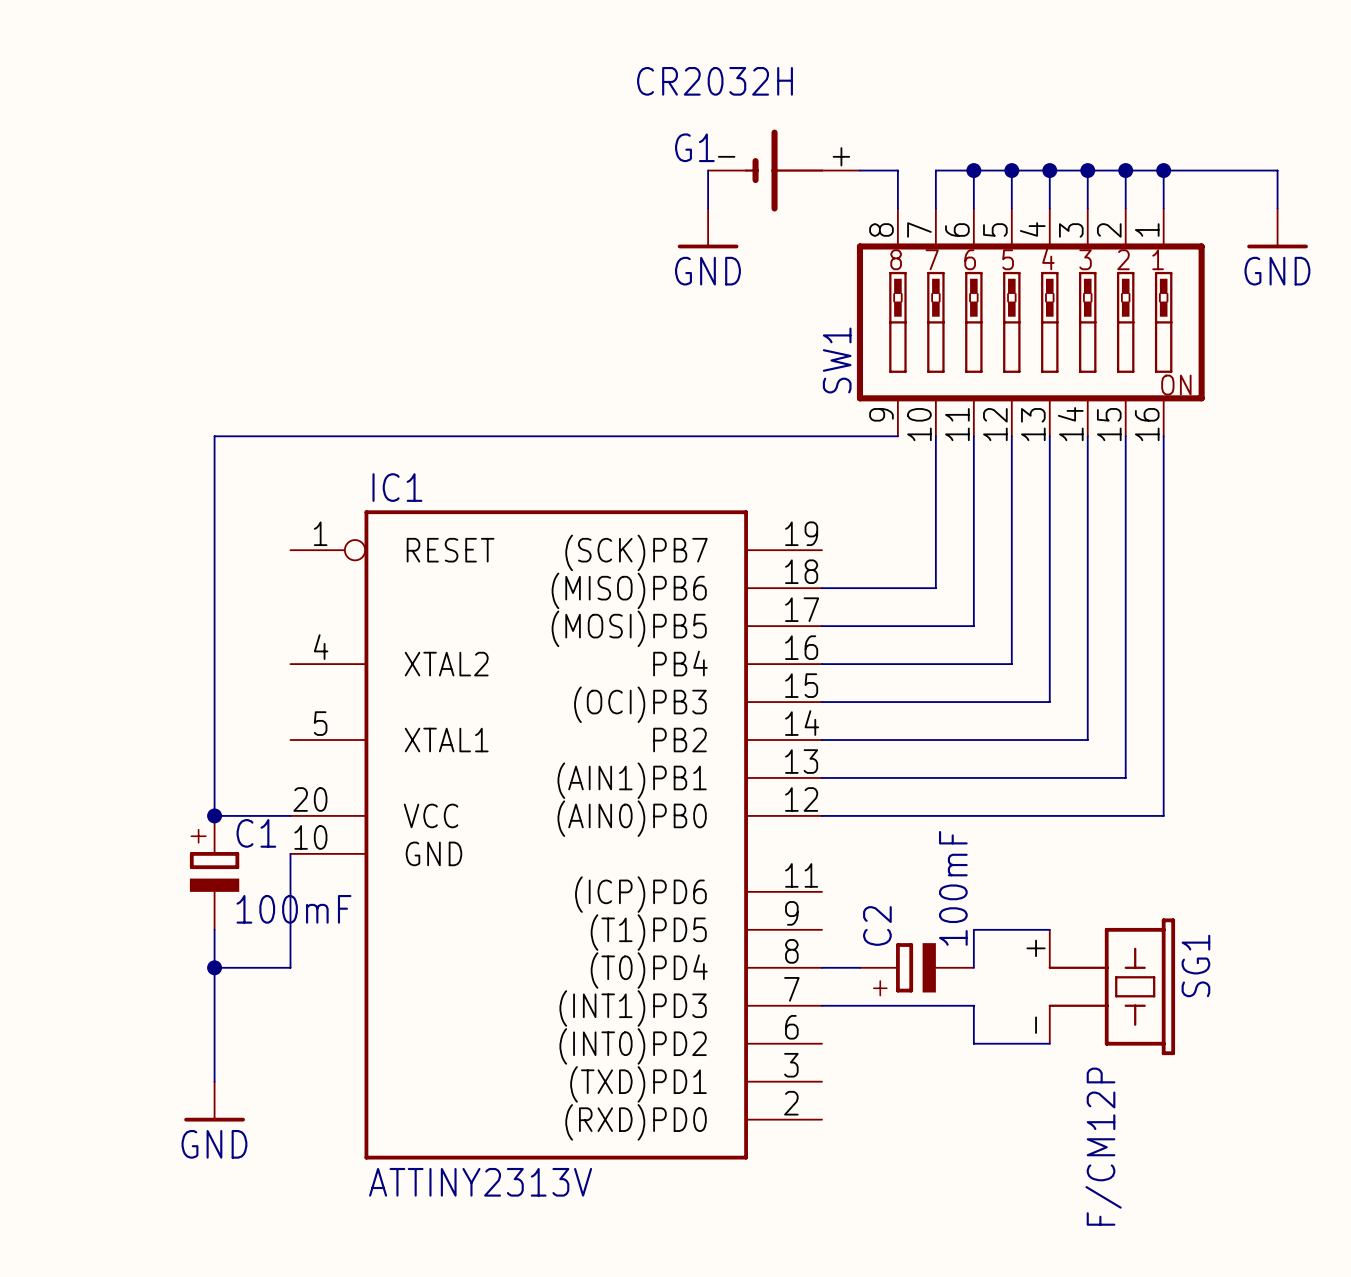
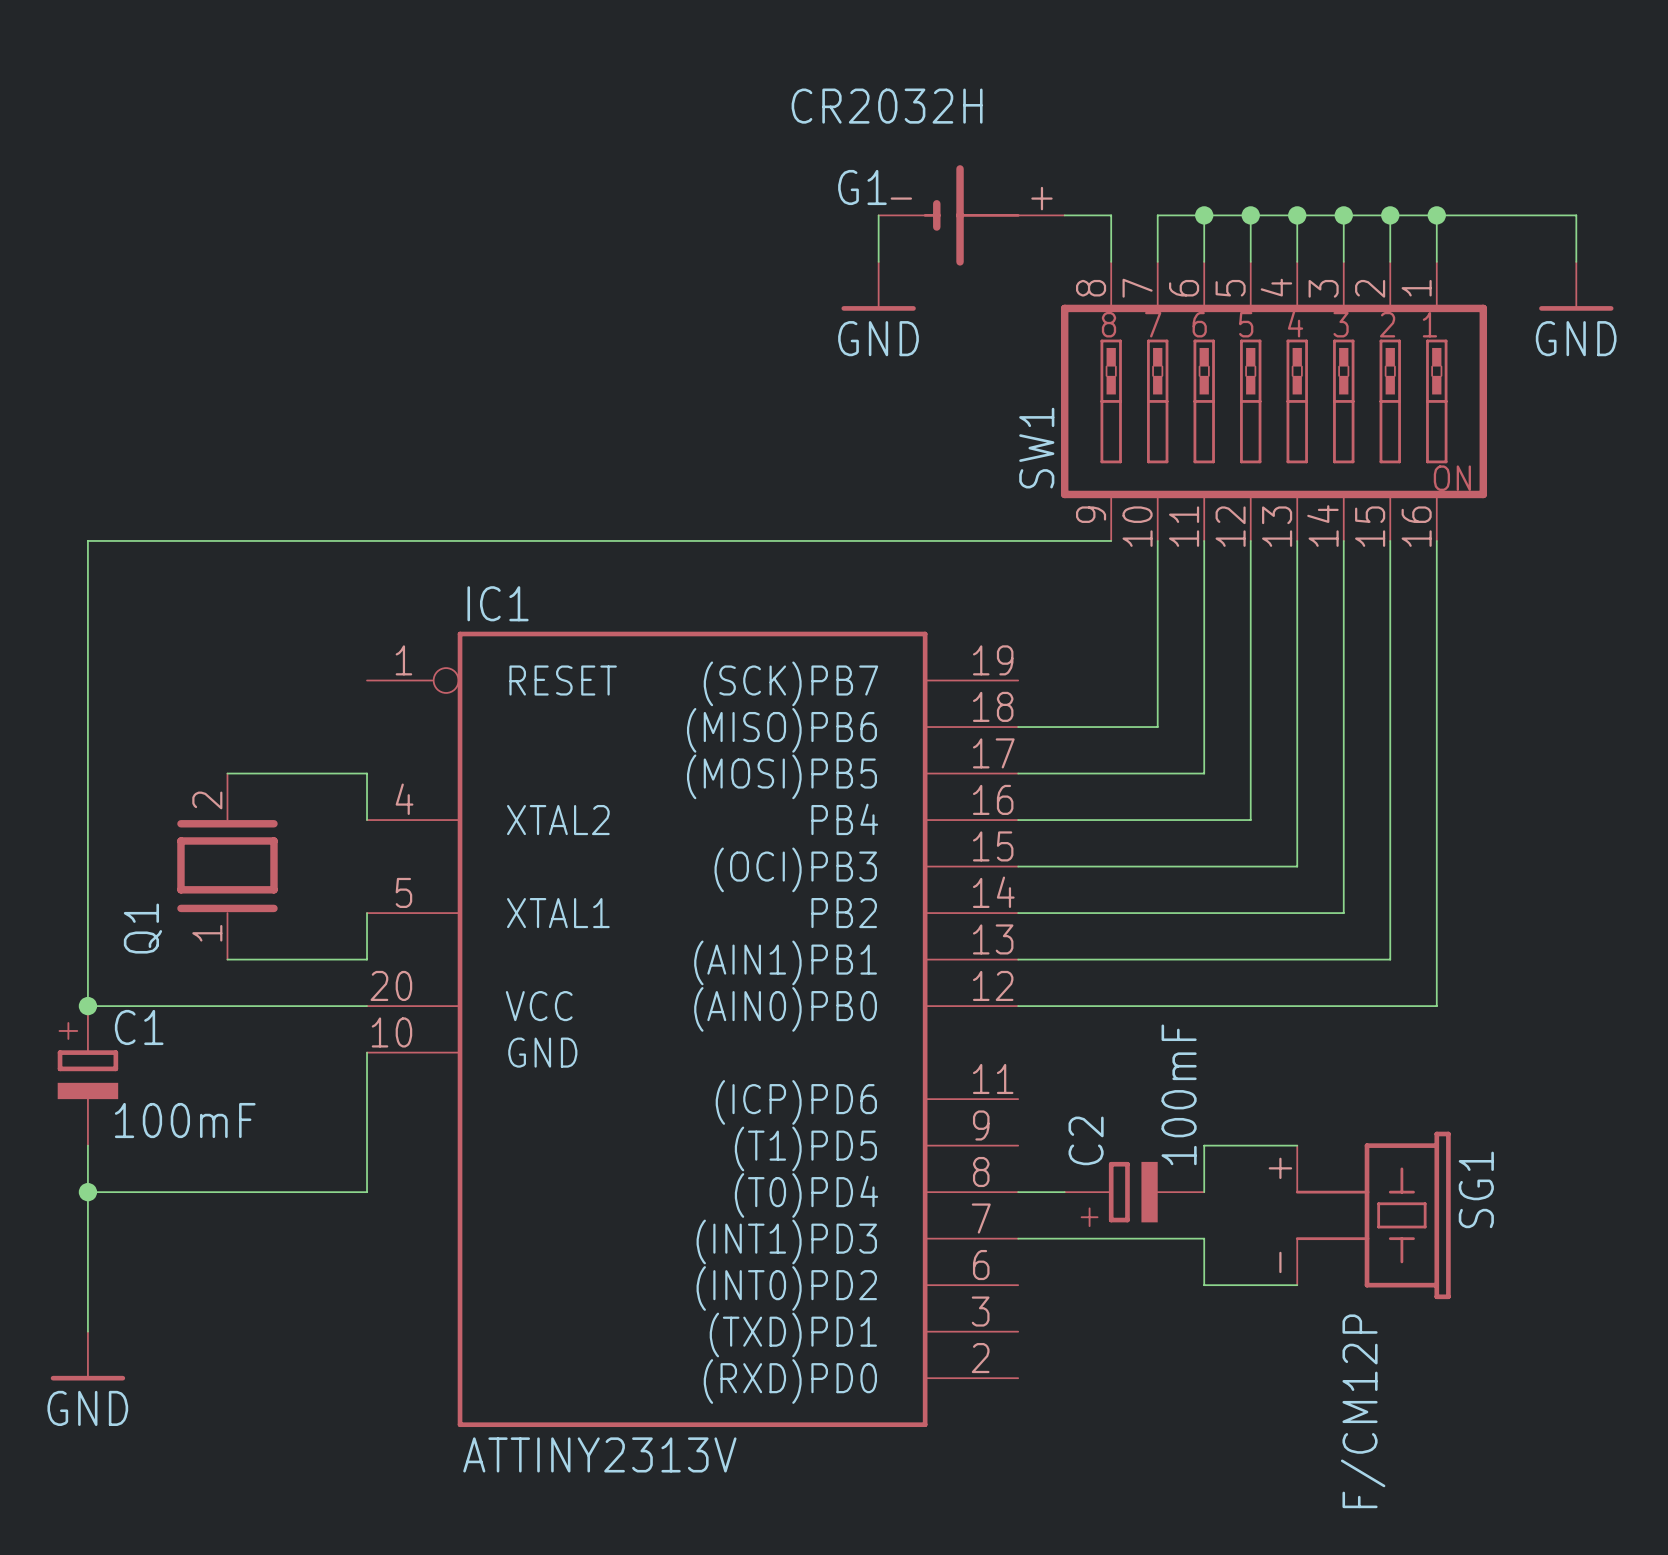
wire: (214, 436) (214, 815) -> (273, 540) (87, 540) (87, 1006) (273, 1006)
wire: none -> (227, 773) (367, 773) (367, 820)
Q1: none -> (227, 866)
wire: none -> (367, 913) (367, 959) (227, 959)
junction: none -> (87, 1006)
junction: (214, 815) -> none
C1 position: (214, 872) -> (87, 1075)
wire: (214, 929) (214, 1081) -> (87, 1145) (87, 1331)
wire: none -> (87, 1192) (273, 1192)
junction: none -> (87, 1192)
junction: (214, 967) -> none
power symbol position: GND (214, 1101) -> GND (87, 1356)

